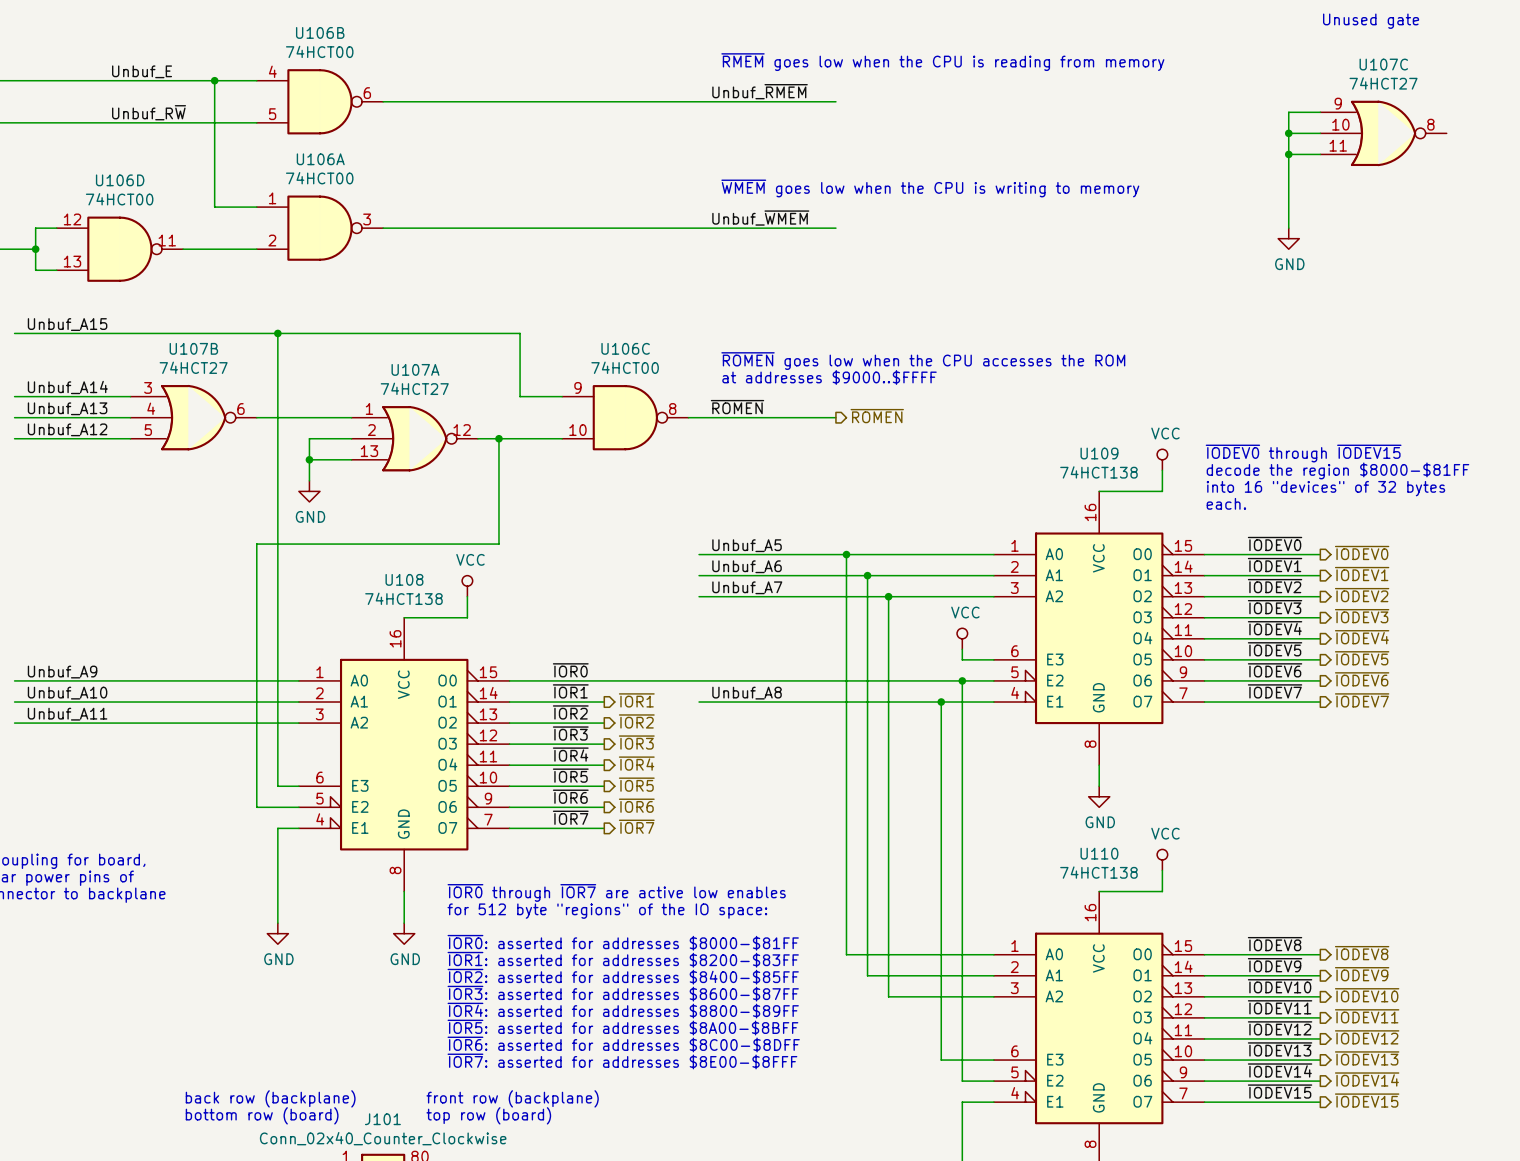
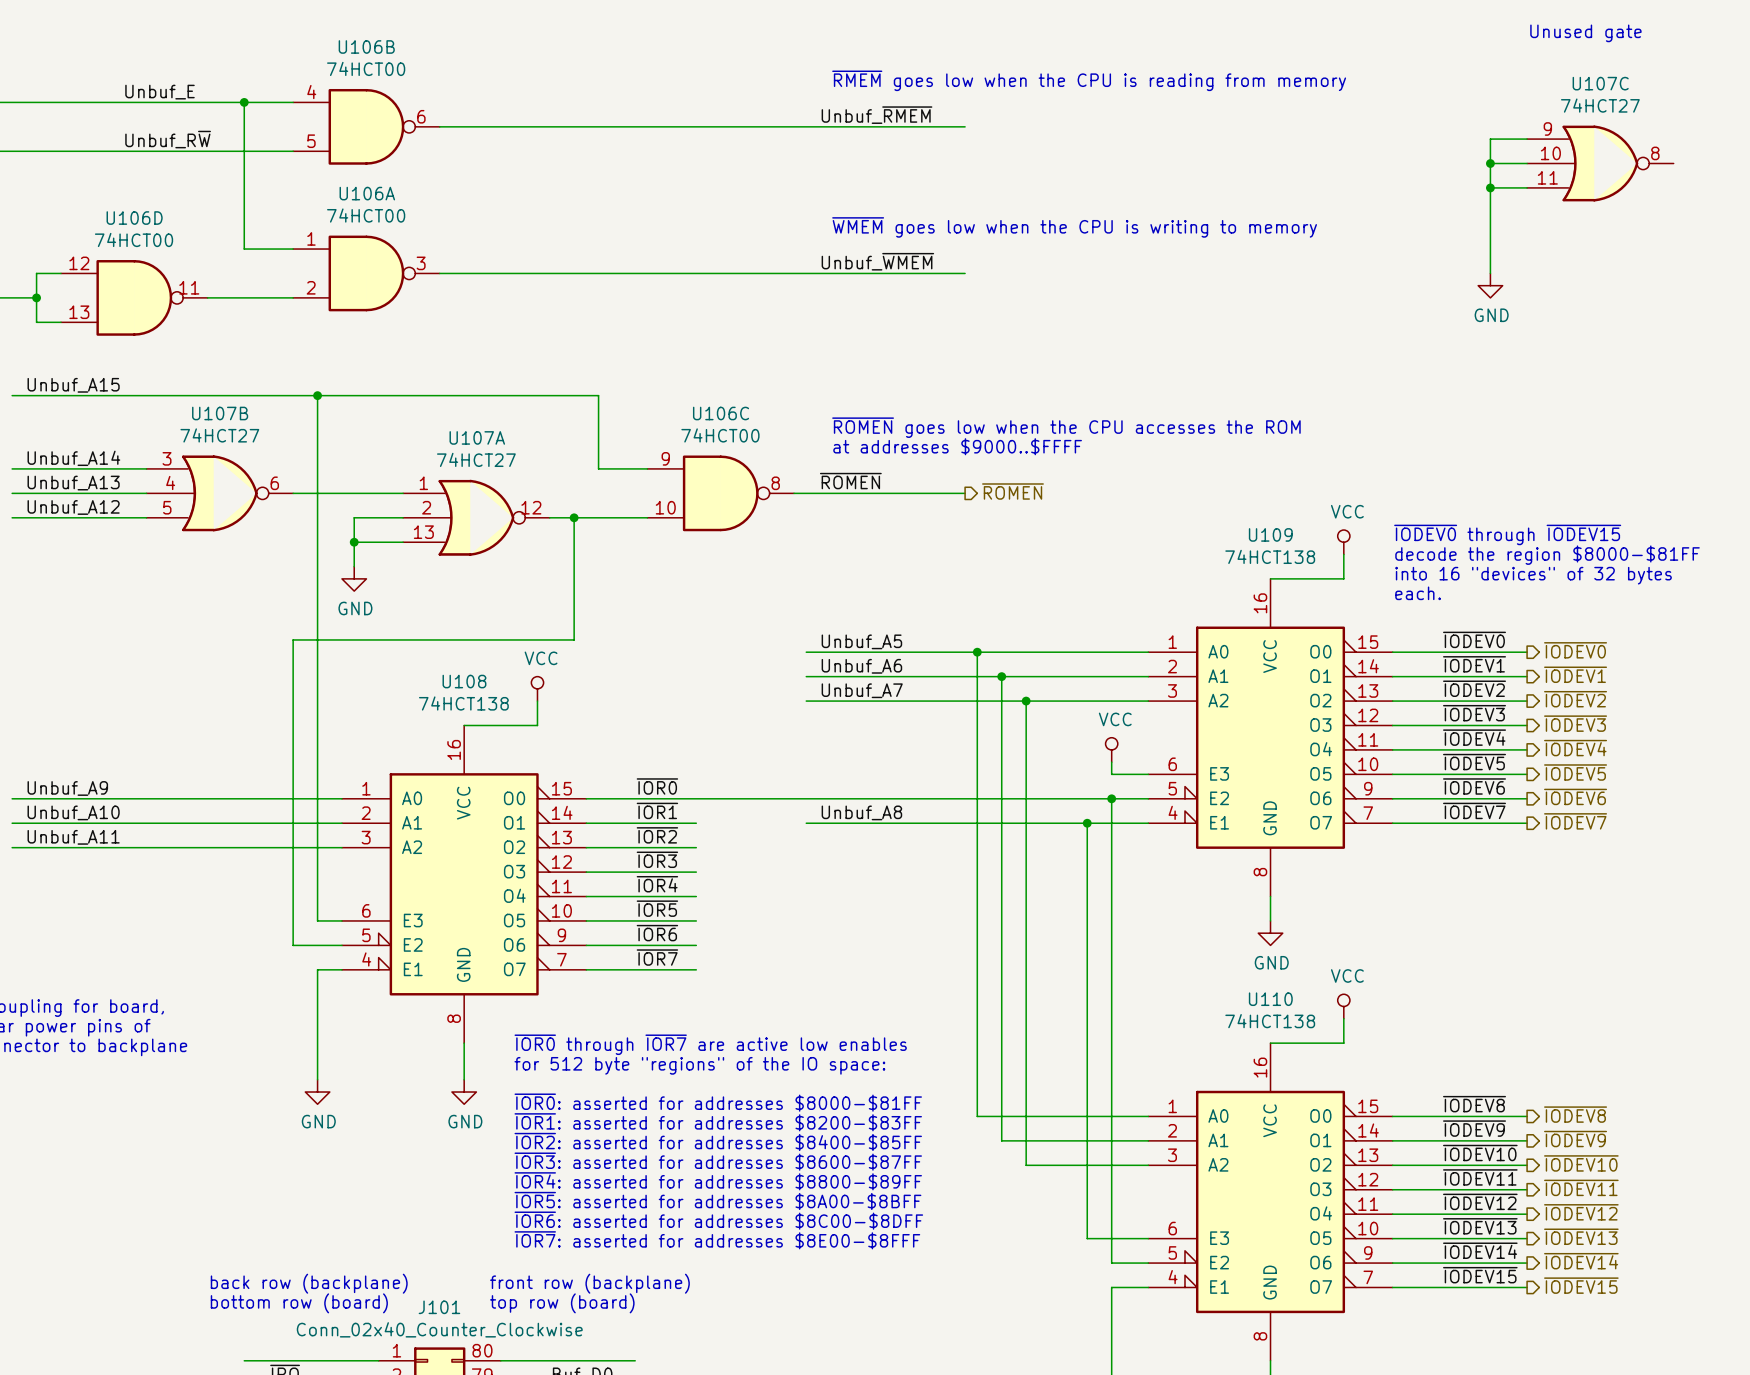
hierarchical label: ~{IOR1} (636, 700) -> none
hierarchical label: ~{IOR2} (636, 721) -> none
hierarchical label: ~{IOR3} (636, 742) -> none
hierarchical label: ~{IOR4} (636, 763) -> none
hierarchical label: ~{IOR5} (636, 784) -> none
hierarchical label: ~{IOR6} (636, 805) -> none
hierarchical label: ~{IOR7} (636, 826) -> none

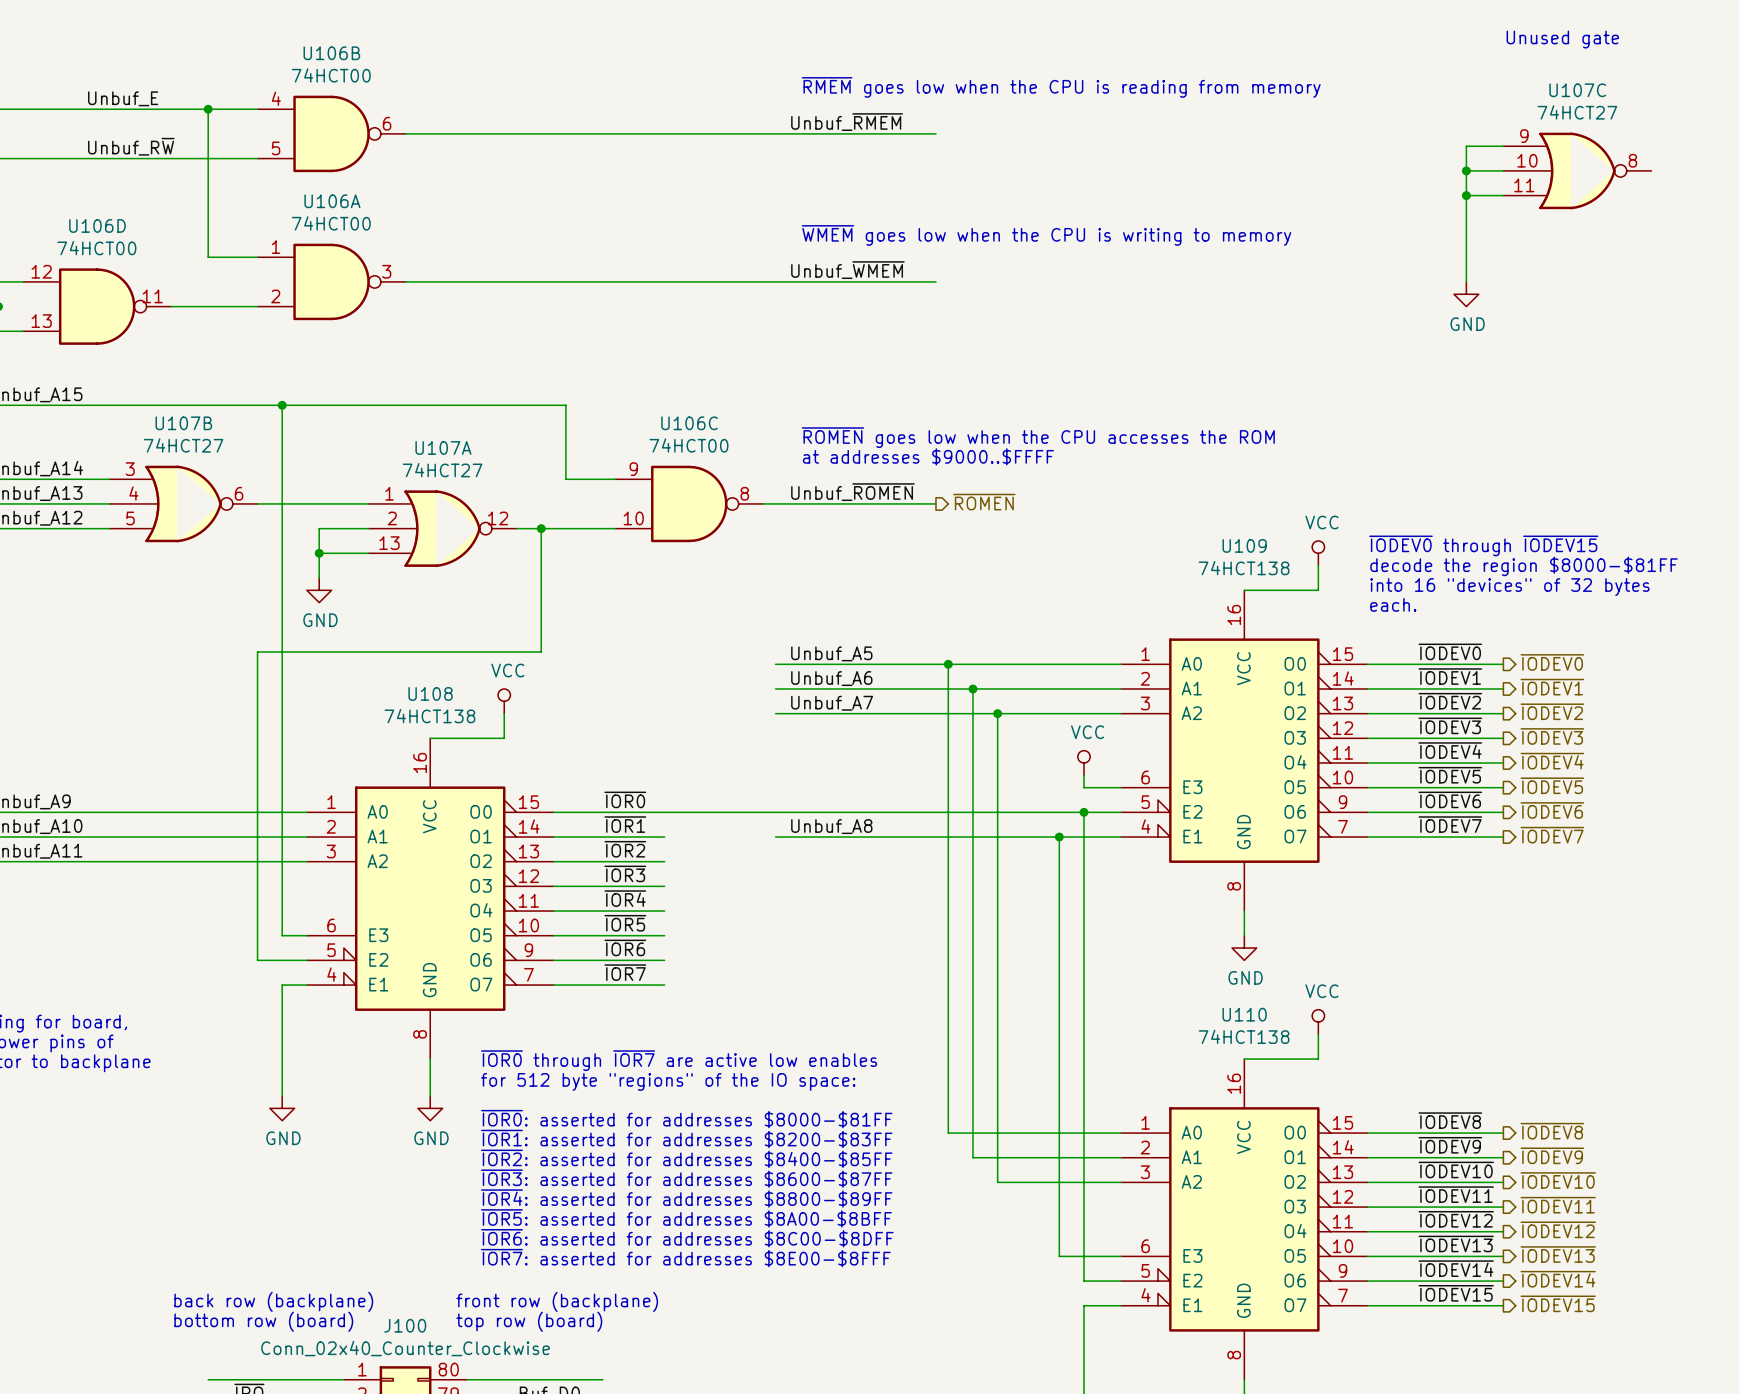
label: ~{ROMEN} (850, 481) -> Unbuf_~{ROMEN} (852, 492)
J101 name: J101 (439, 1307) -> J100 (405, 1325)

